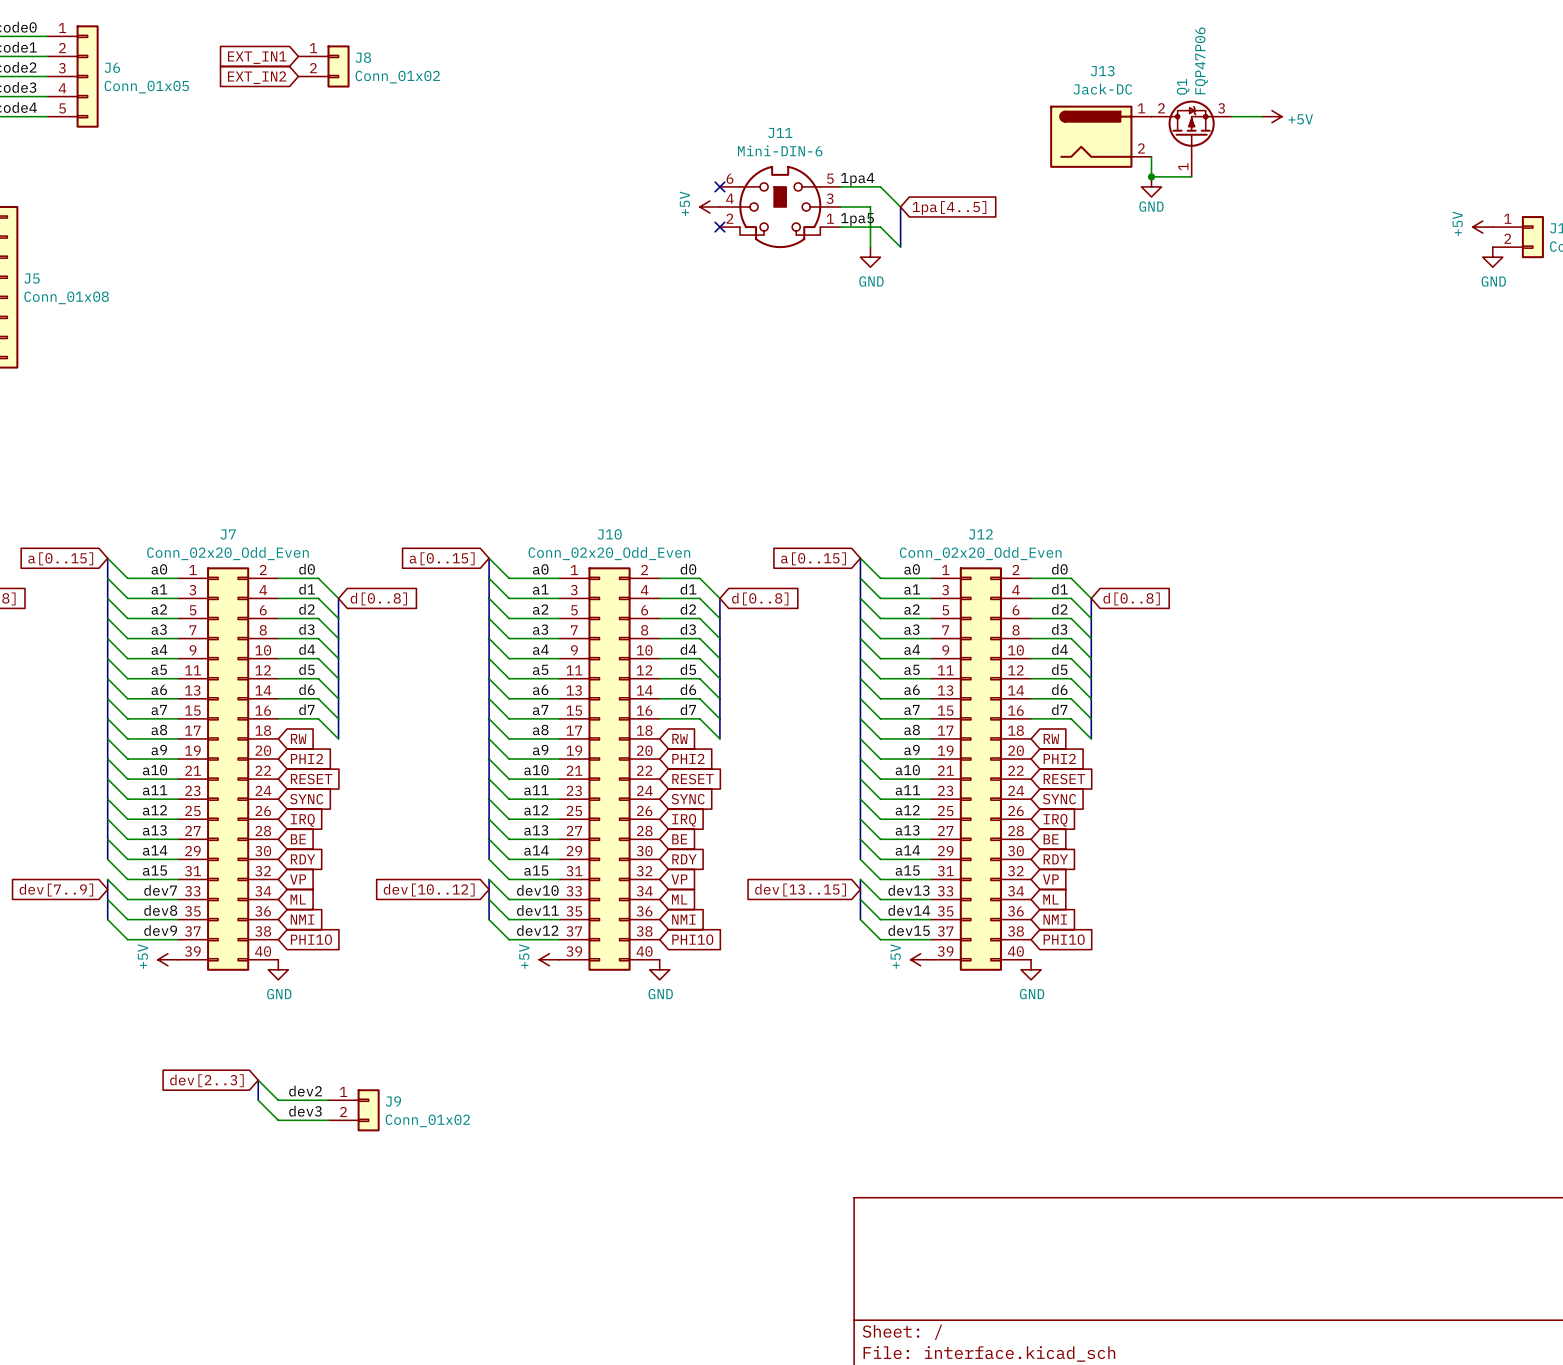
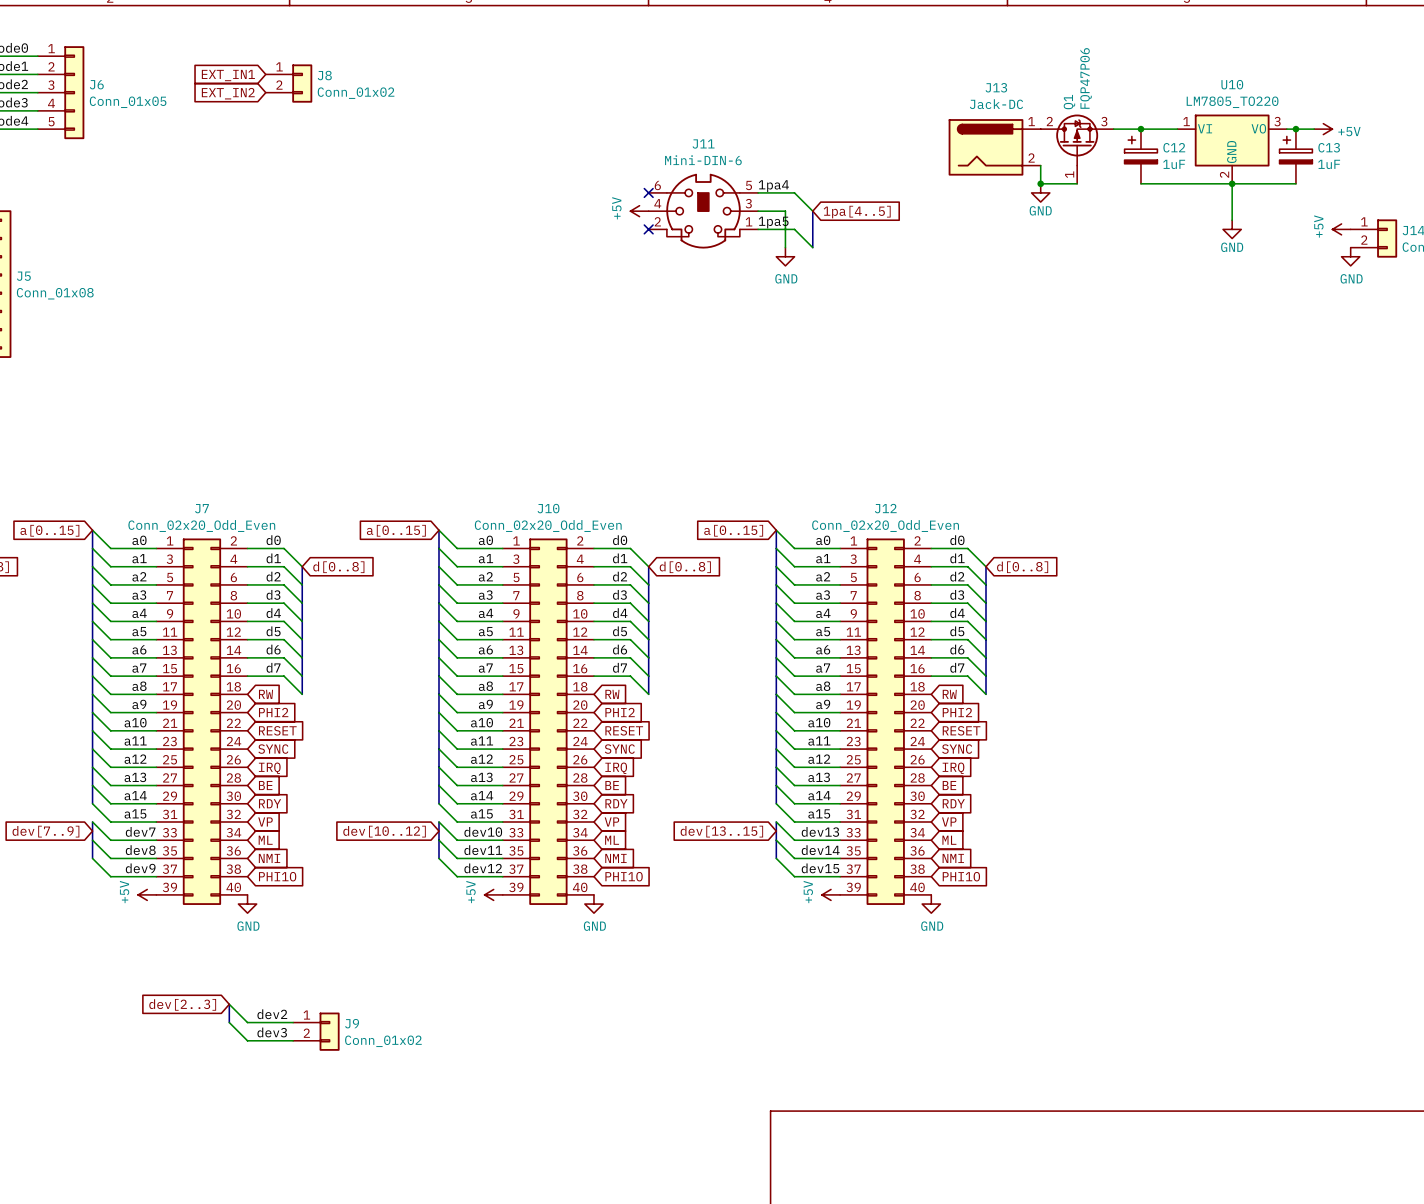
junction: none -> (1140, 129)
power symbol position: +5V (1271, 116) -> +5V (1323, 129)
wire: none -> (1286, 129) (1314, 129)
junction: none -> (1295, 129)
U10: none -> LM7805_TO220 (1232, 149)
C12: none -> 1uF (1140, 156)
C13: none -> 1uF (1295, 156)
wire: none -> (1140, 183) (1295, 183)
wire: none -> (1232, 183) (1232, 220)
junction: none -> (1232, 183)
power symbol: none -> GND (1232, 229)

